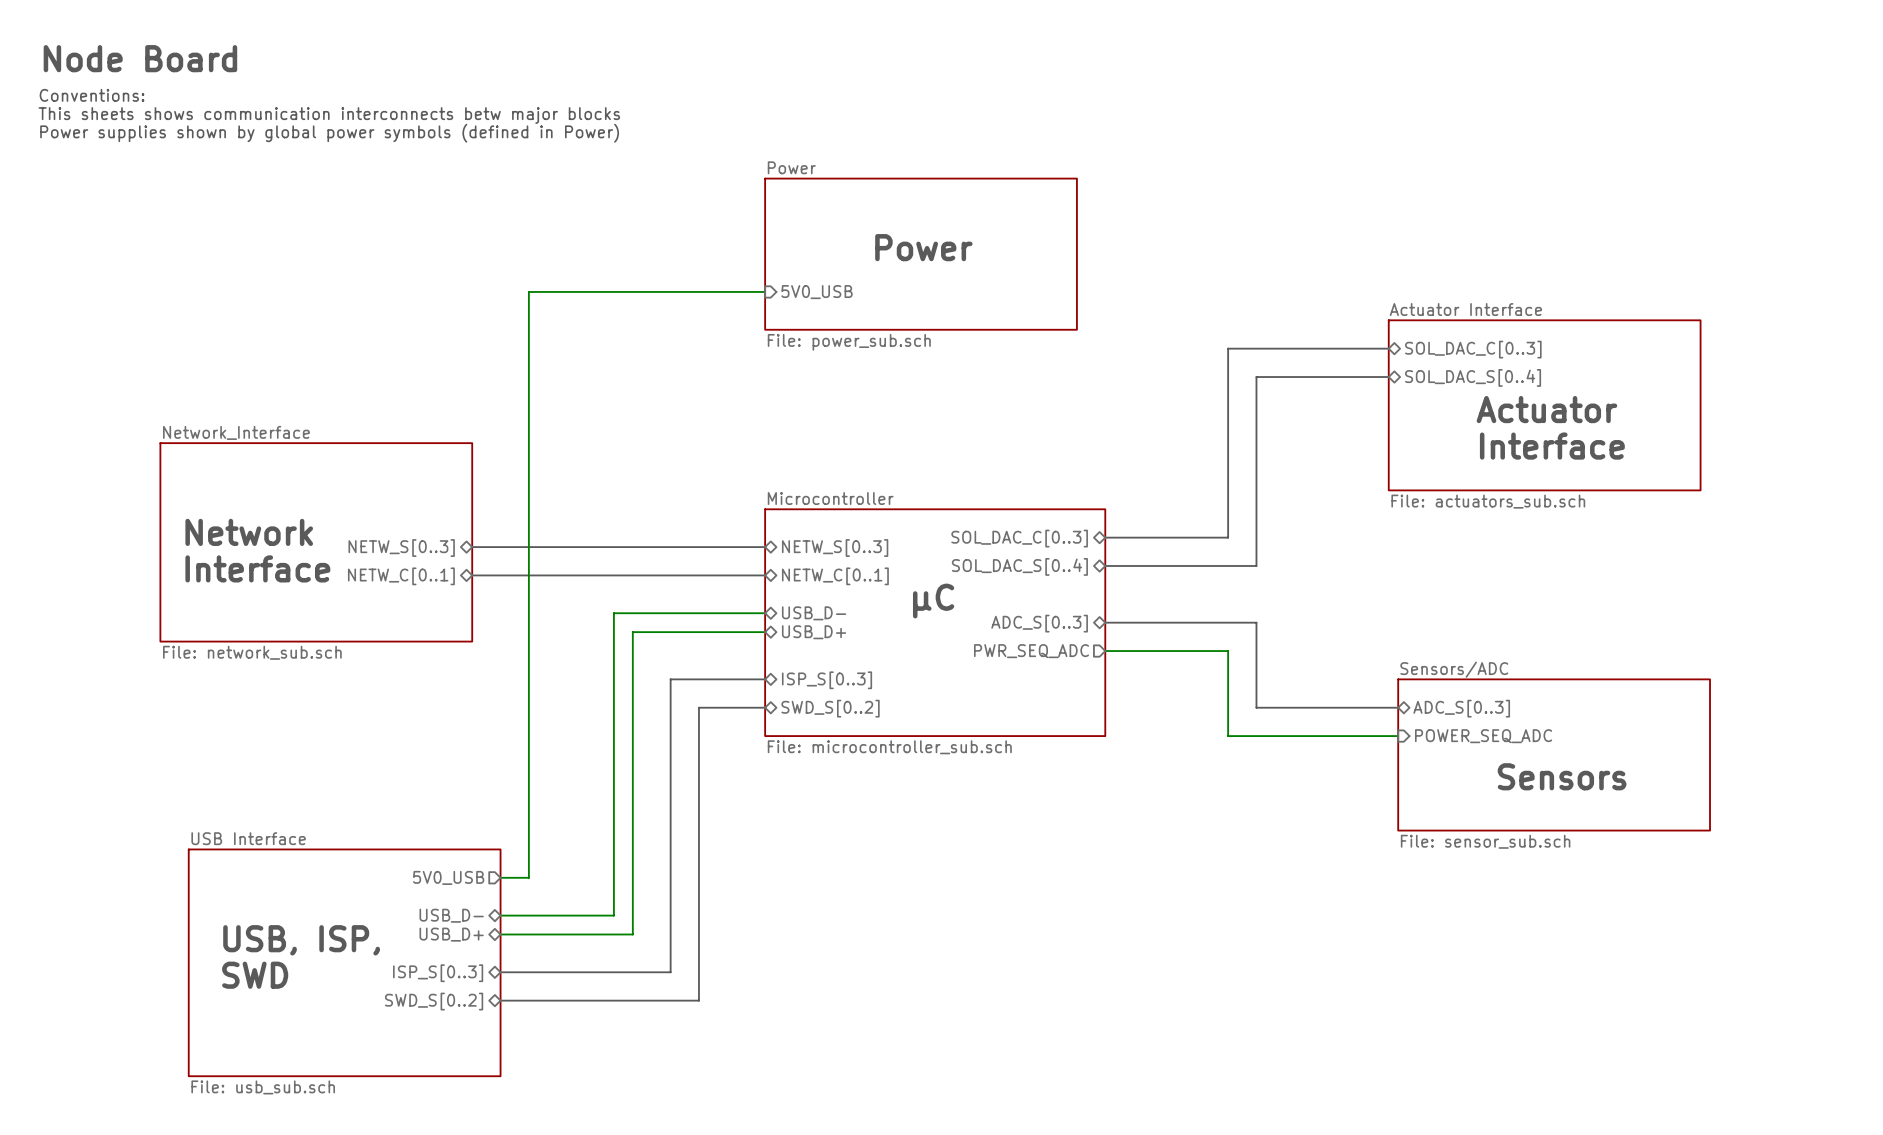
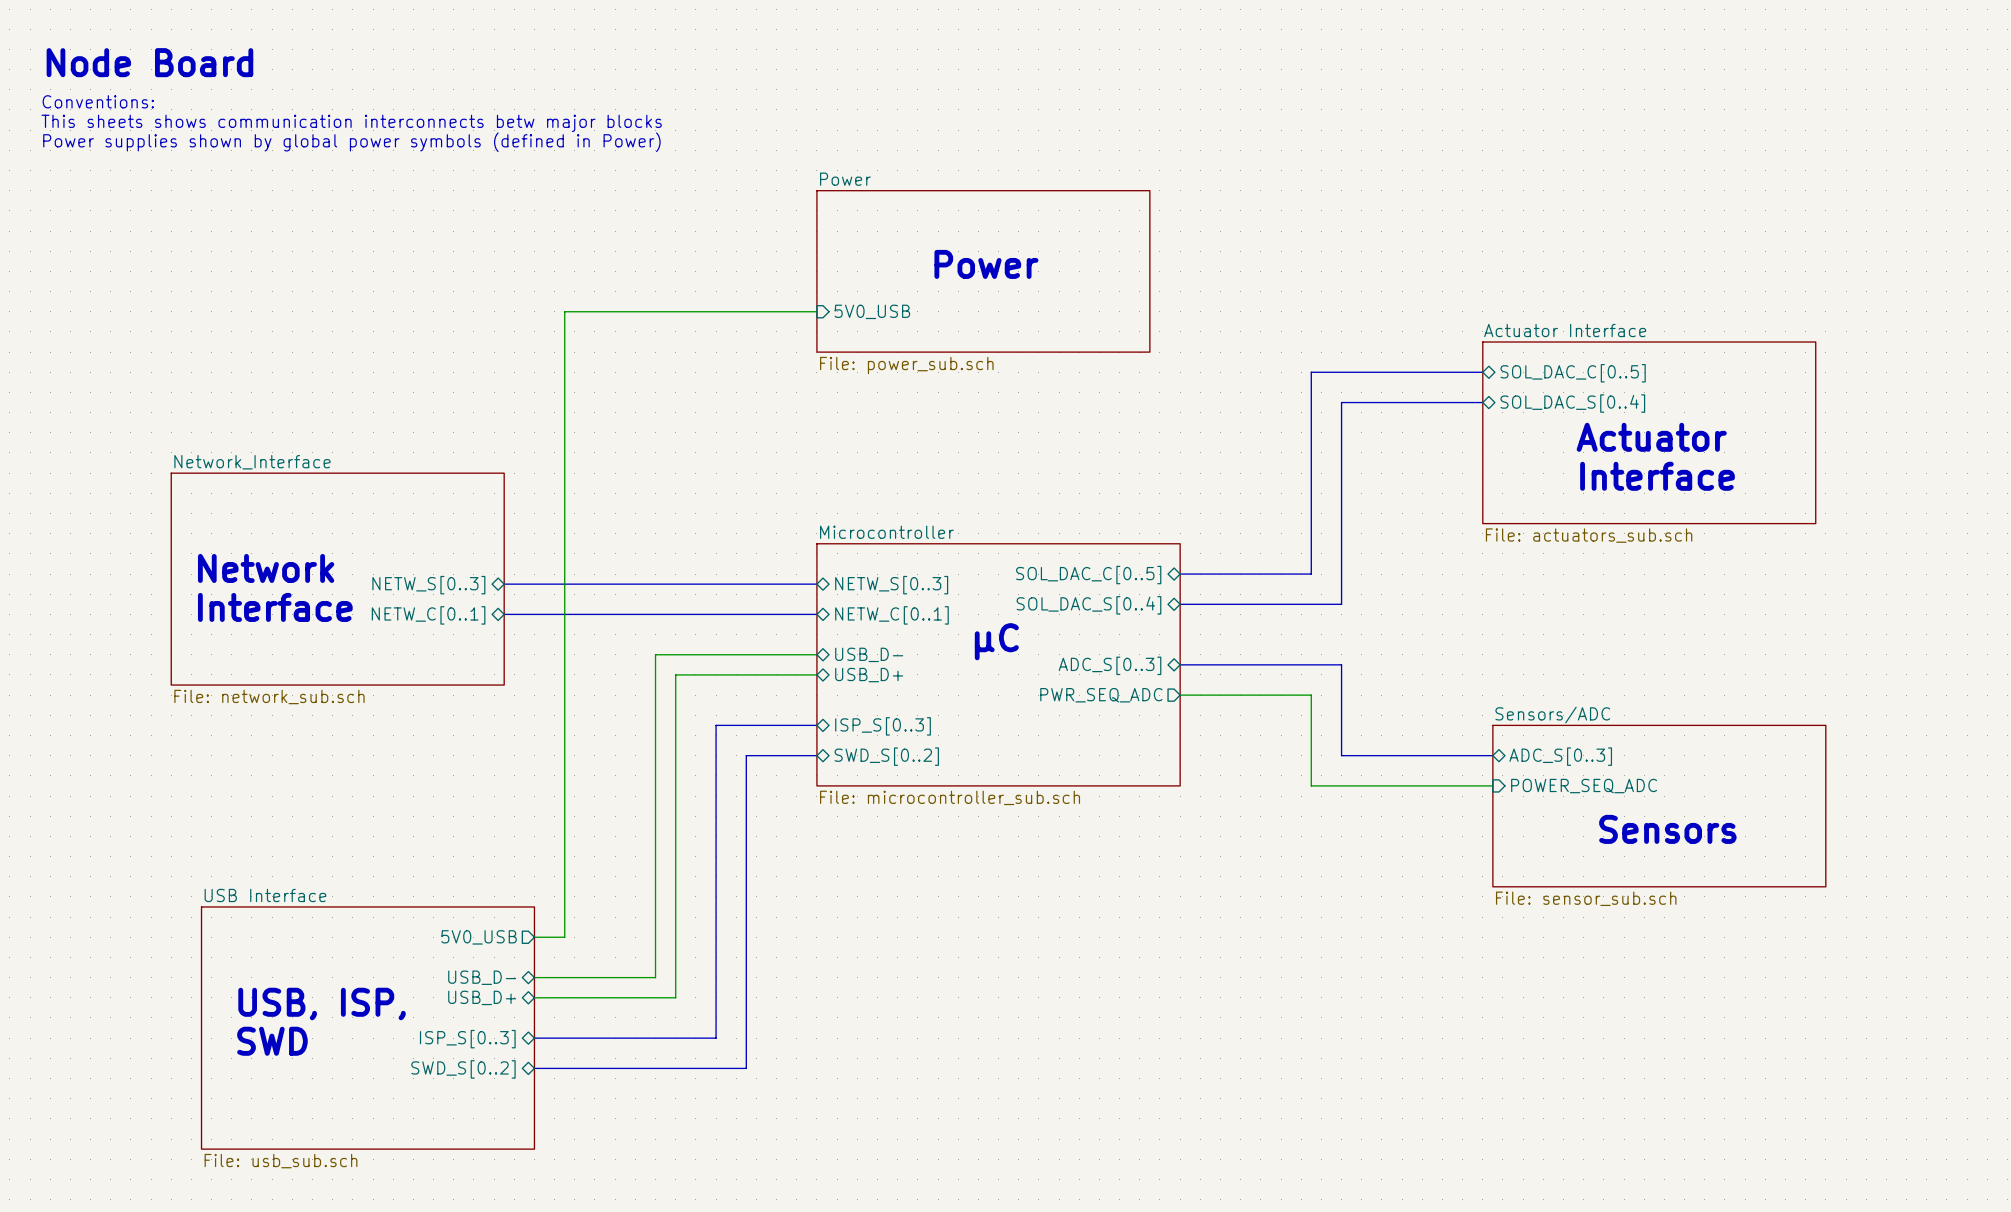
sheet pin: SOL_DAC_C[0..3] (1473, 349) -> SOL_DAC_C[0..5] (1573, 373)
sheet pin: SOL_DAC_C[0..3] (1019, 538) -> SOL_DAC_C[0..5] (1088, 575)

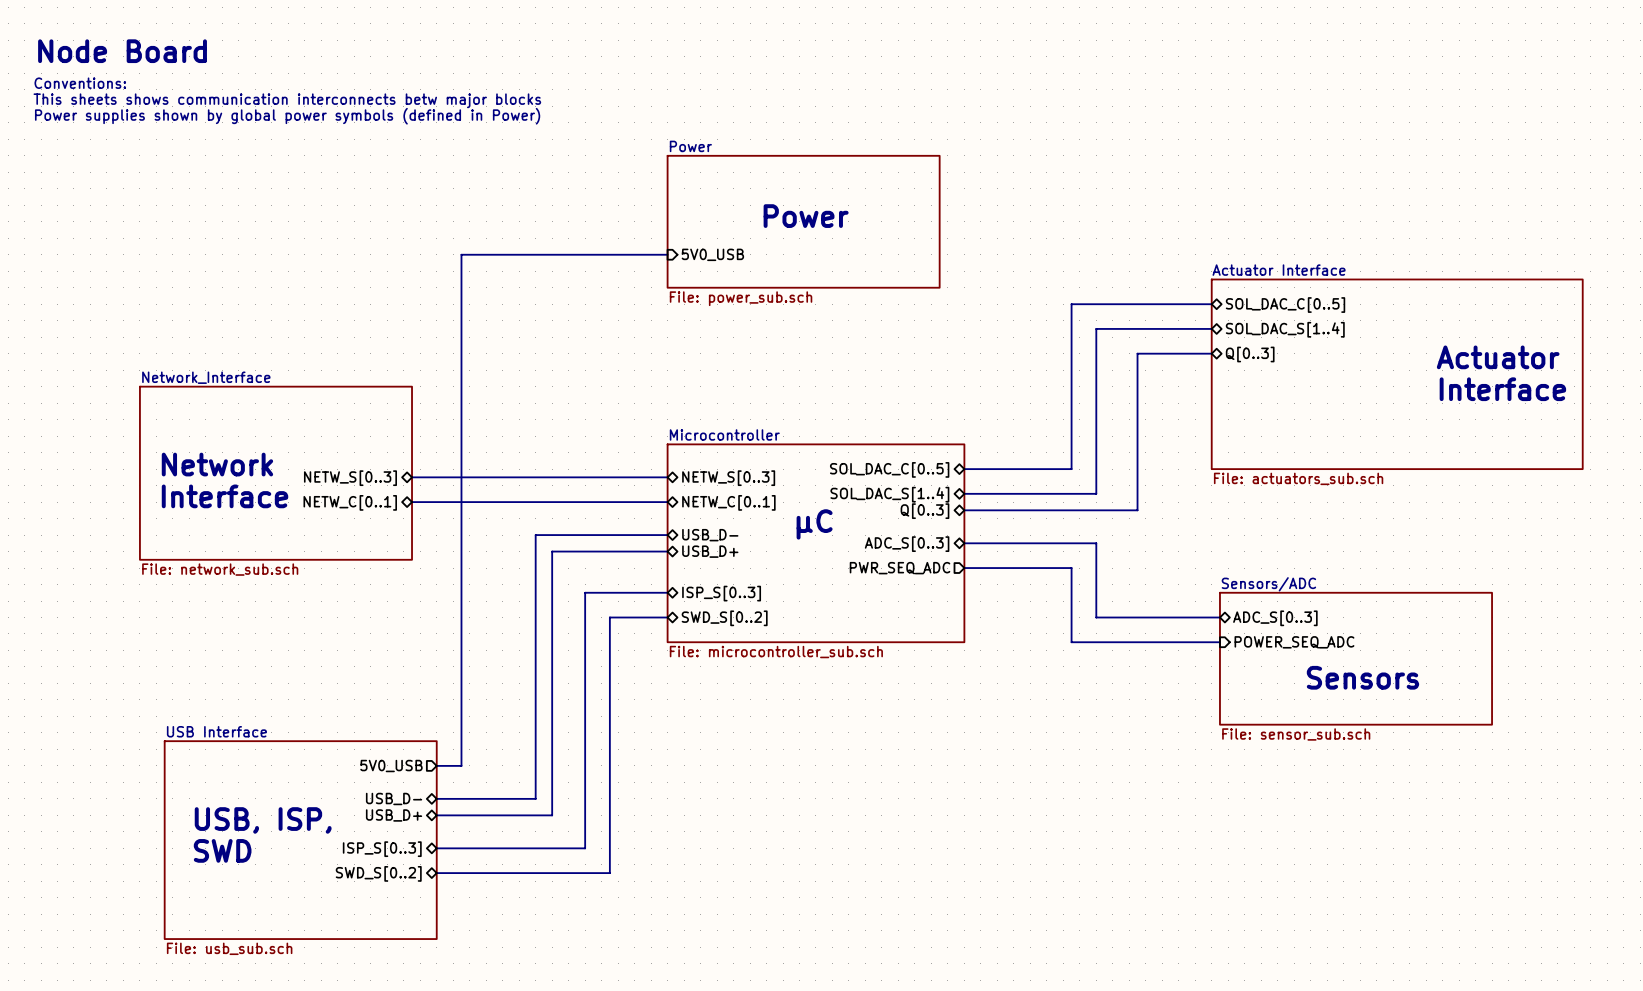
sheet pin: SOL_DAC_S[0..4] (1572, 403) -> SOL_DAC_S[1..4] (1285, 329)
bus: none -> (1211, 353) (1137, 353) (1137, 510) (964, 510)
sheet Actuator Interface: File: actuators_sub.sch (1649, 432) -> none
sheet pin: none -> Q[0..3] (1250, 354)
text position: Actuator (1651, 437) -> Actuator (1498, 357)
sheet Actuator Interface: none -> File: actuators_sub.sch (1397, 374)
text position: Interface (1657, 476) -> Interface (1502, 389)
sheet pin: SOL_DAC_S[0..4] (1088, 605) -> SOL_DAC_S[1..4] (889, 494)
sheet pin: none -> Q[0..3] (924, 511)

